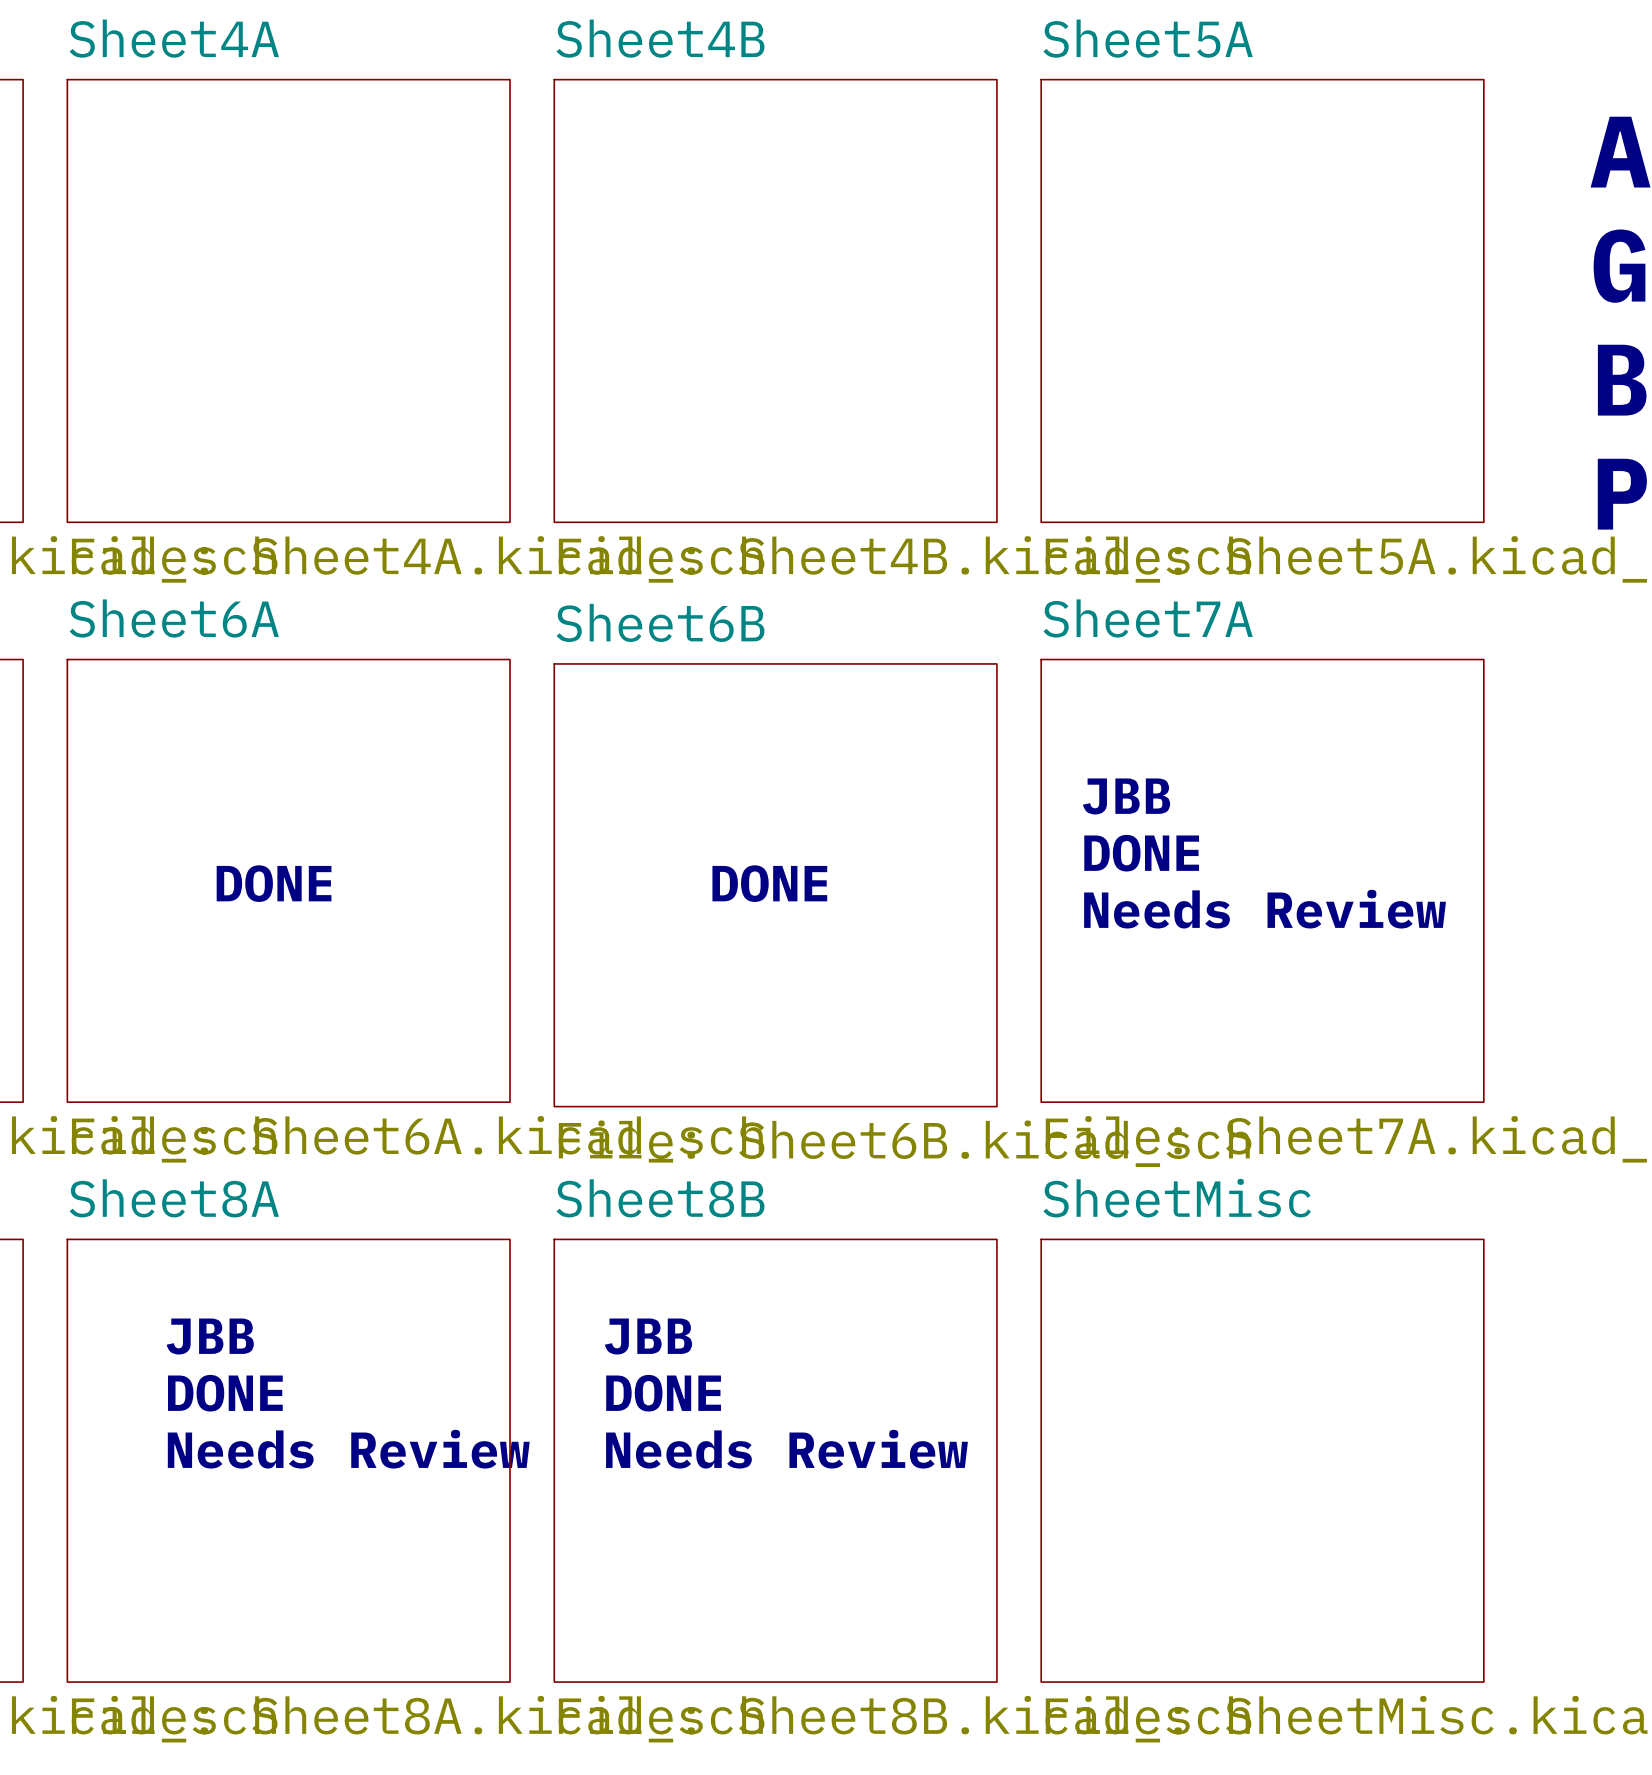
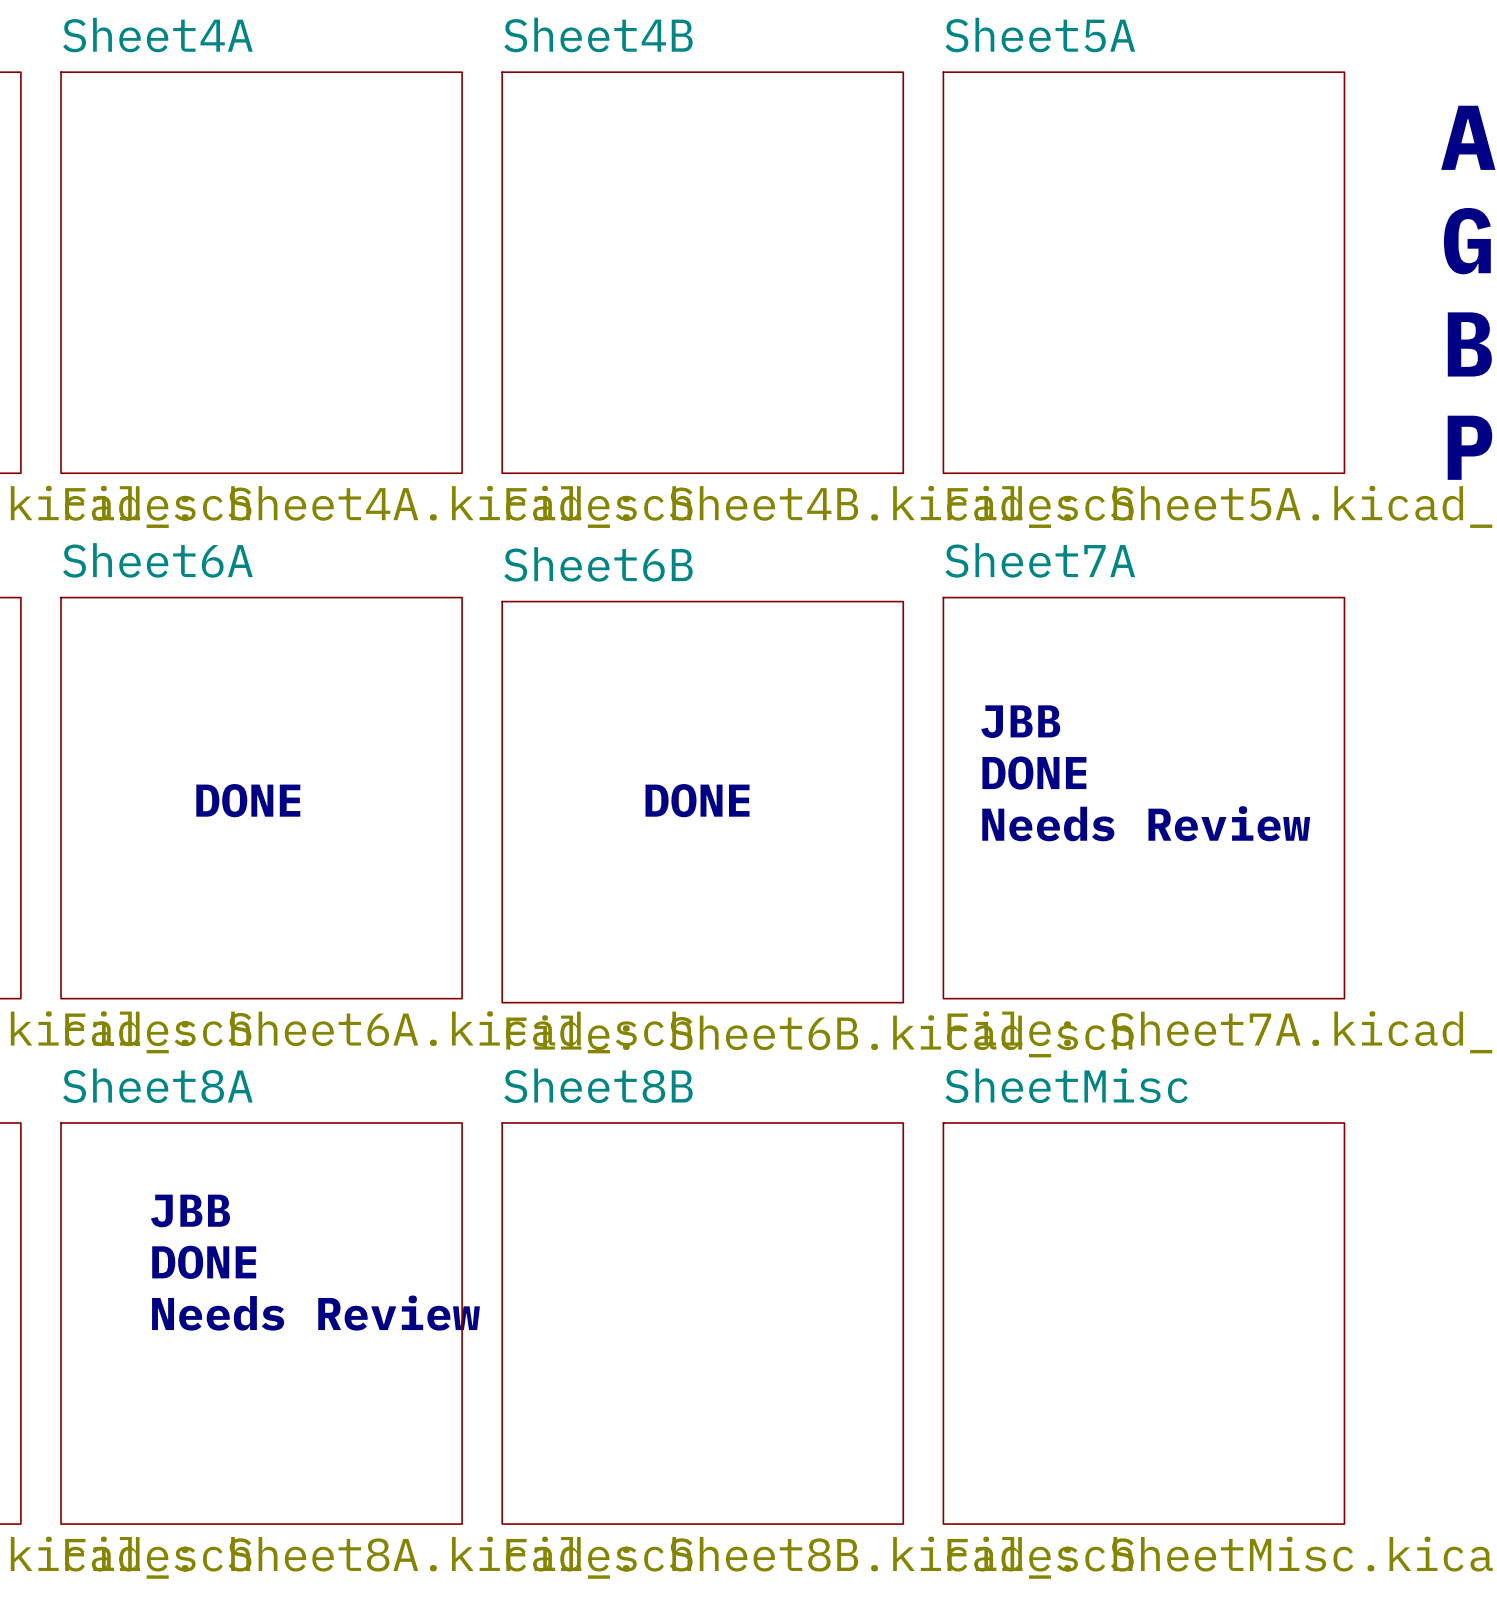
text: JBB (648, 1336) -> none
text: DONE (663, 1393) -> none
text: Needs Review (786, 1449) -> none

